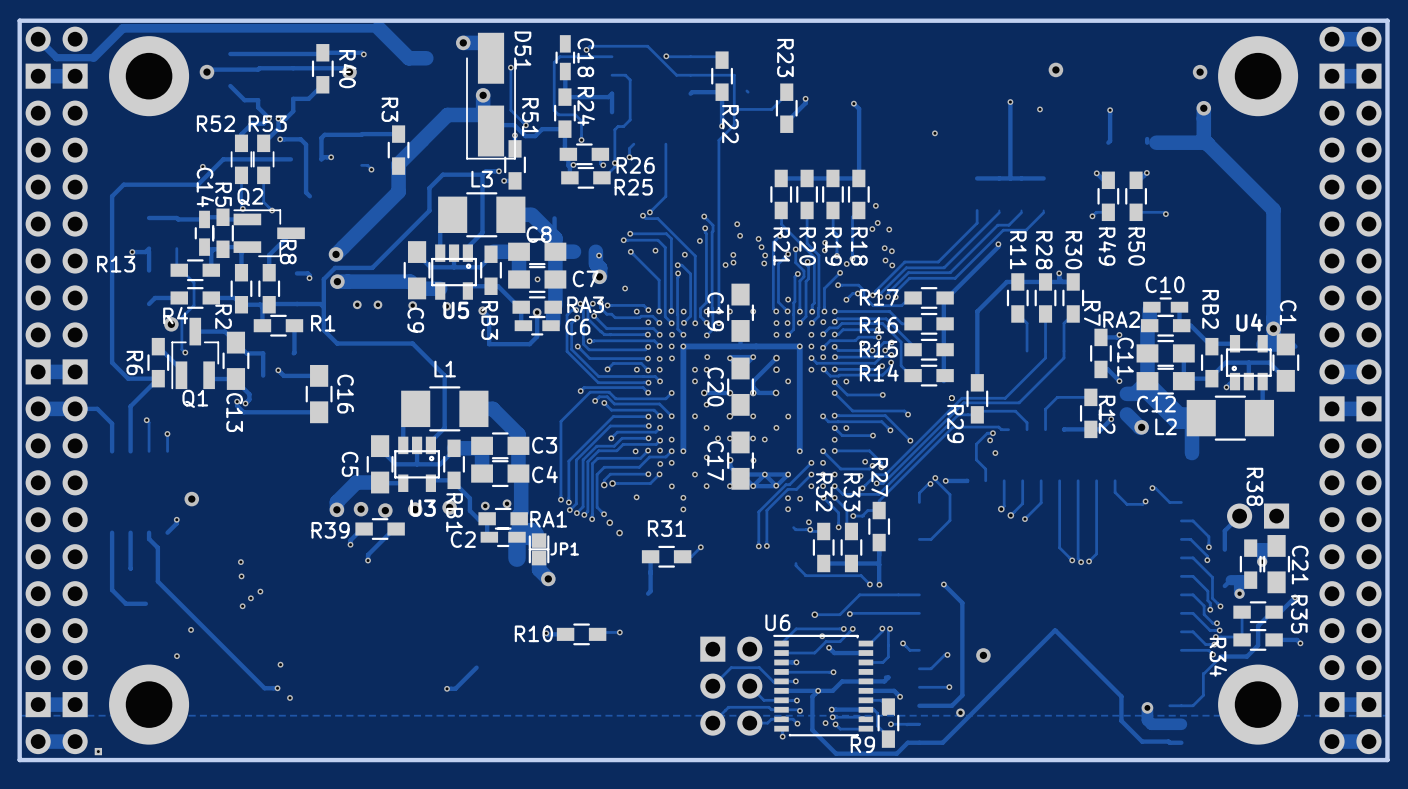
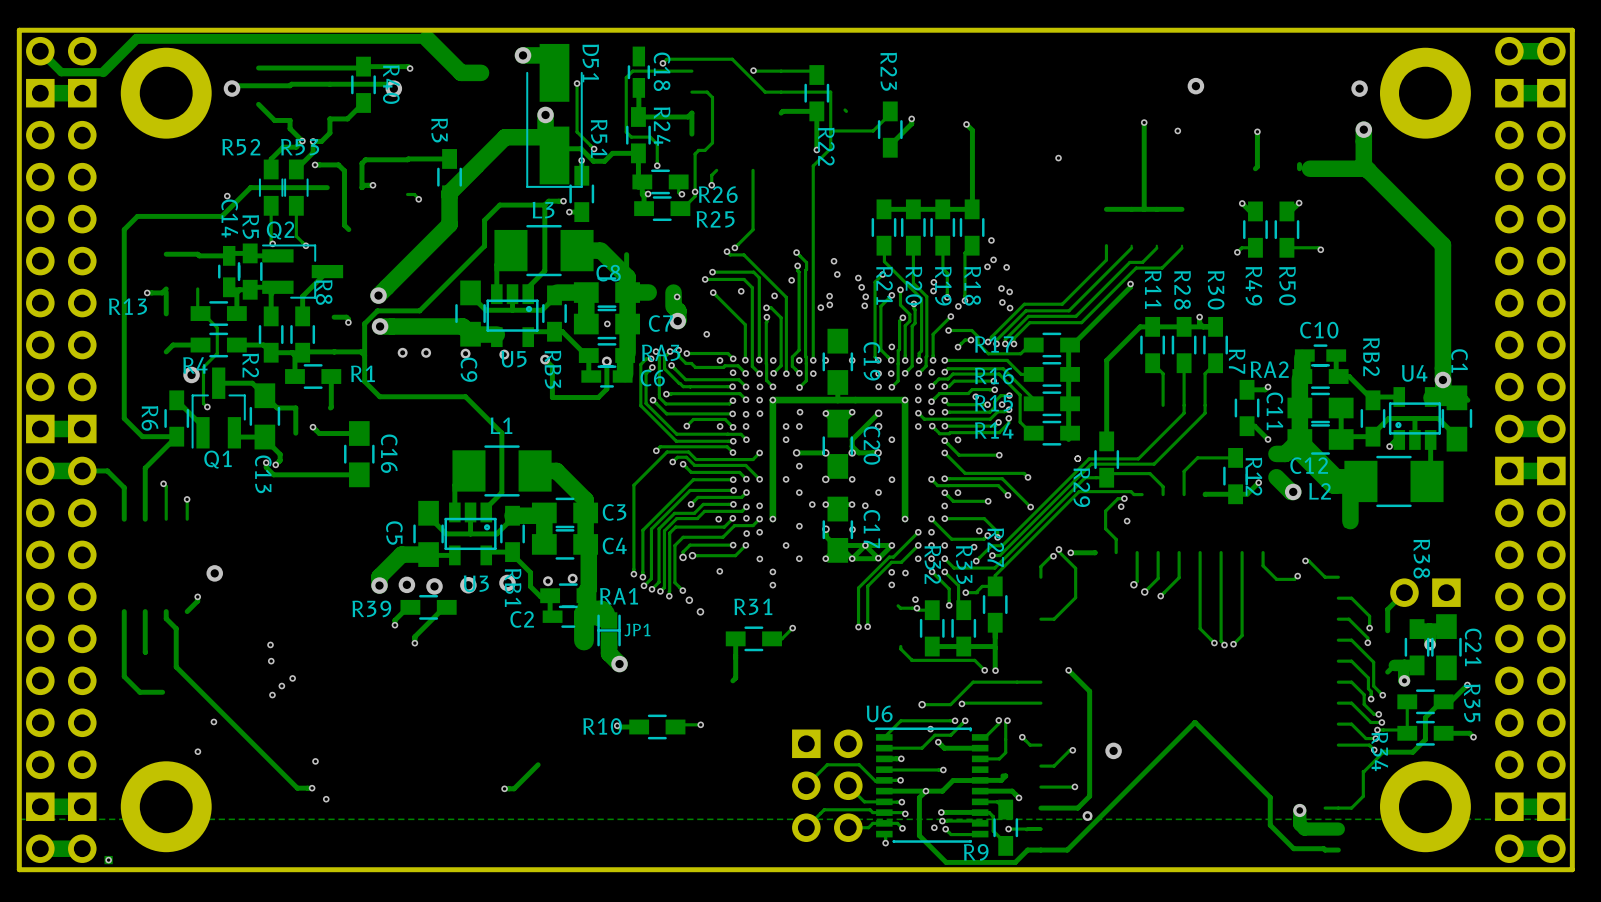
C19 name position: C19 (715, 311) -> C19 (871, 361)
C20 name position: C20 (715, 386) -> C20 (871, 445)
C17 name position: C17 (715, 460) -> C17 (871, 529)

